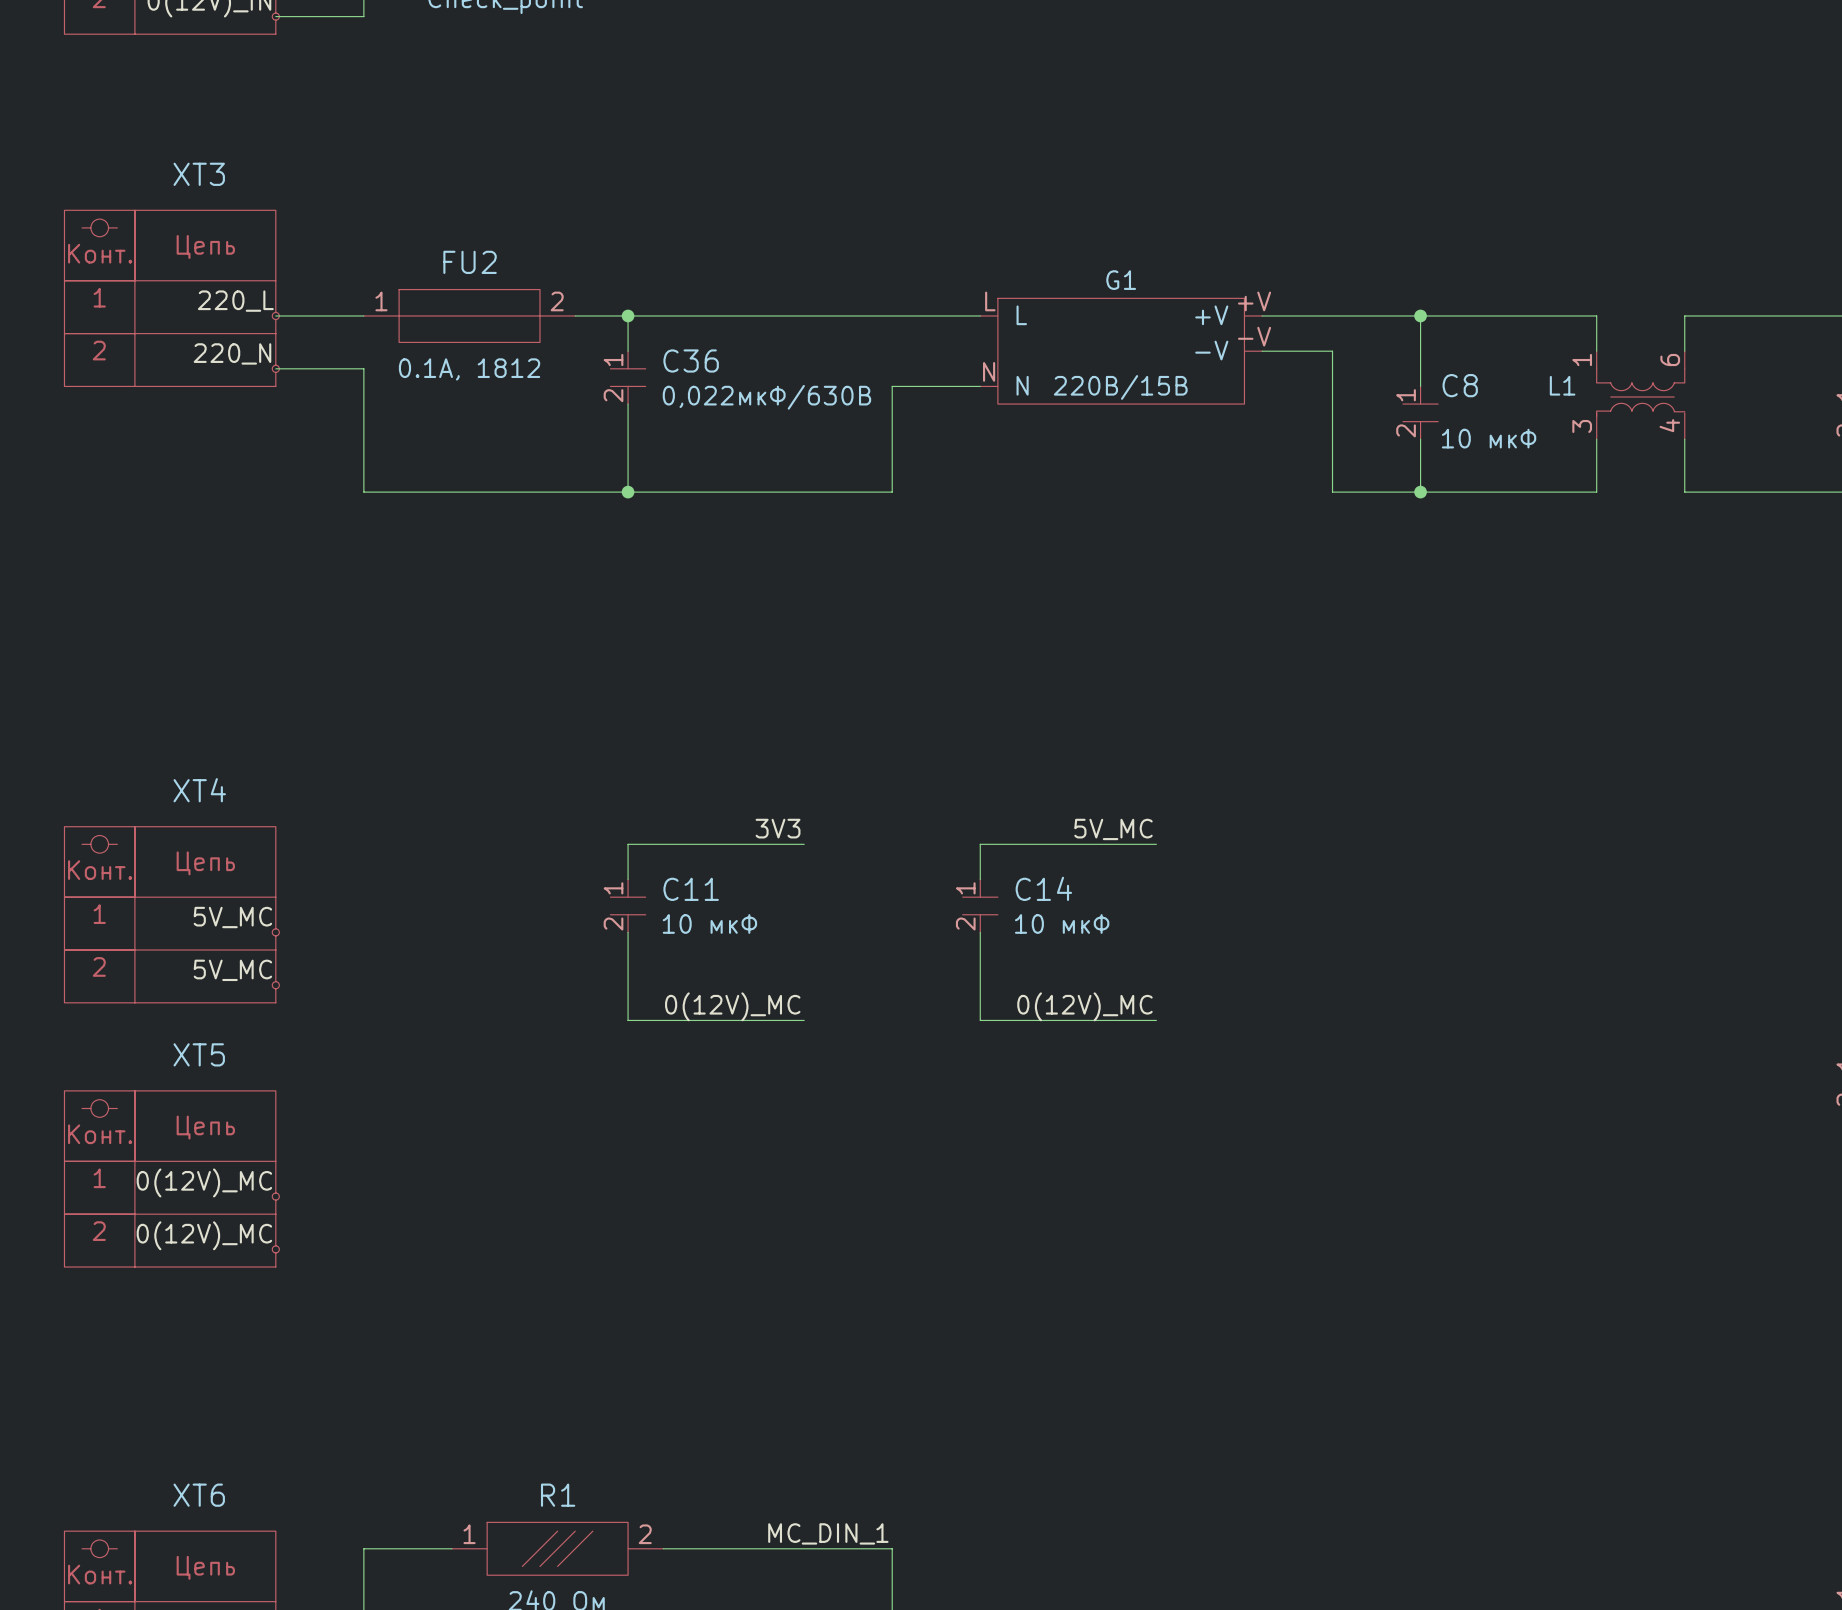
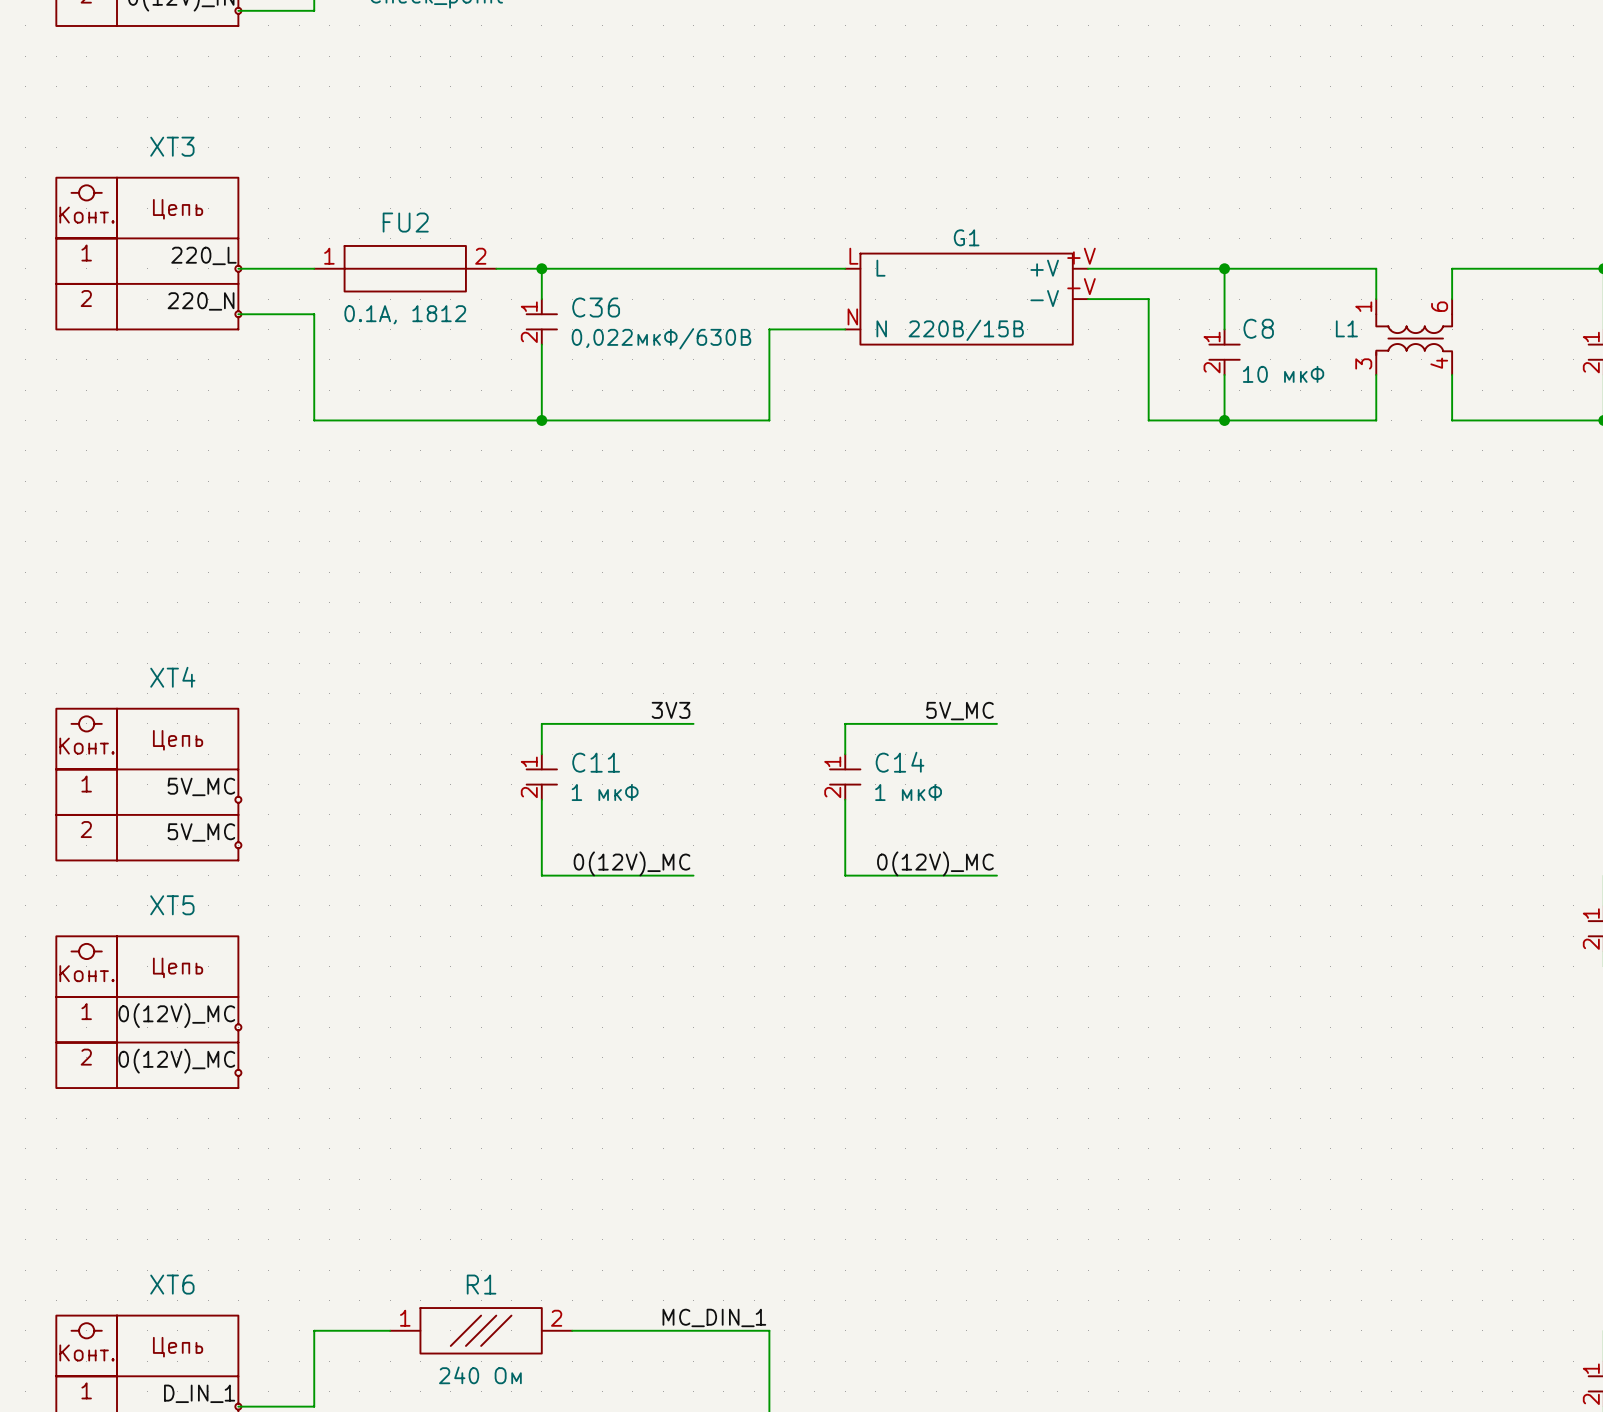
C11 text: 10 мкФ (709, 923) -> 1 мкФ (605, 792)
C14 text: 10 мкФ (1062, 923) -> 1 мкФ (908, 792)

